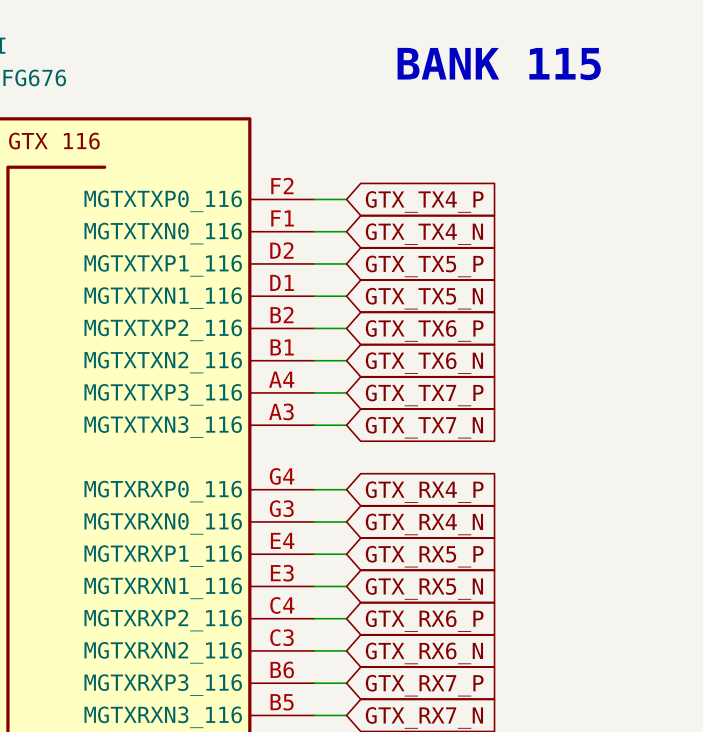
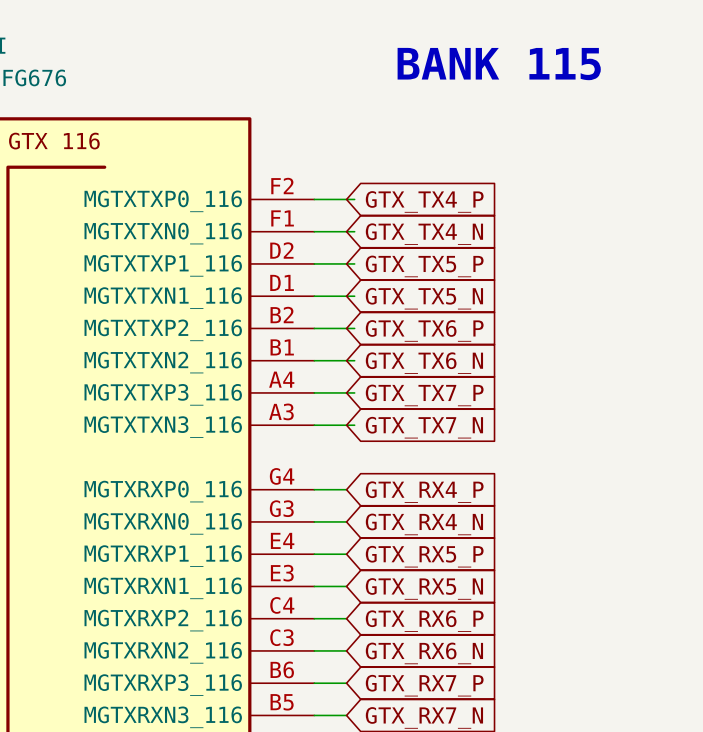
wire: none -> (346, 199) (354, 199)
wire: none -> (346, 231) (354, 231)
wire: none -> (346, 263) (354, 263)
wire: none -> (346, 296) (354, 296)
wire: none -> (346, 328) (354, 328)
wire: none -> (346, 360) (354, 360)
wire: none -> (346, 392) (354, 392)
wire: none -> (346, 425) (354, 425)

